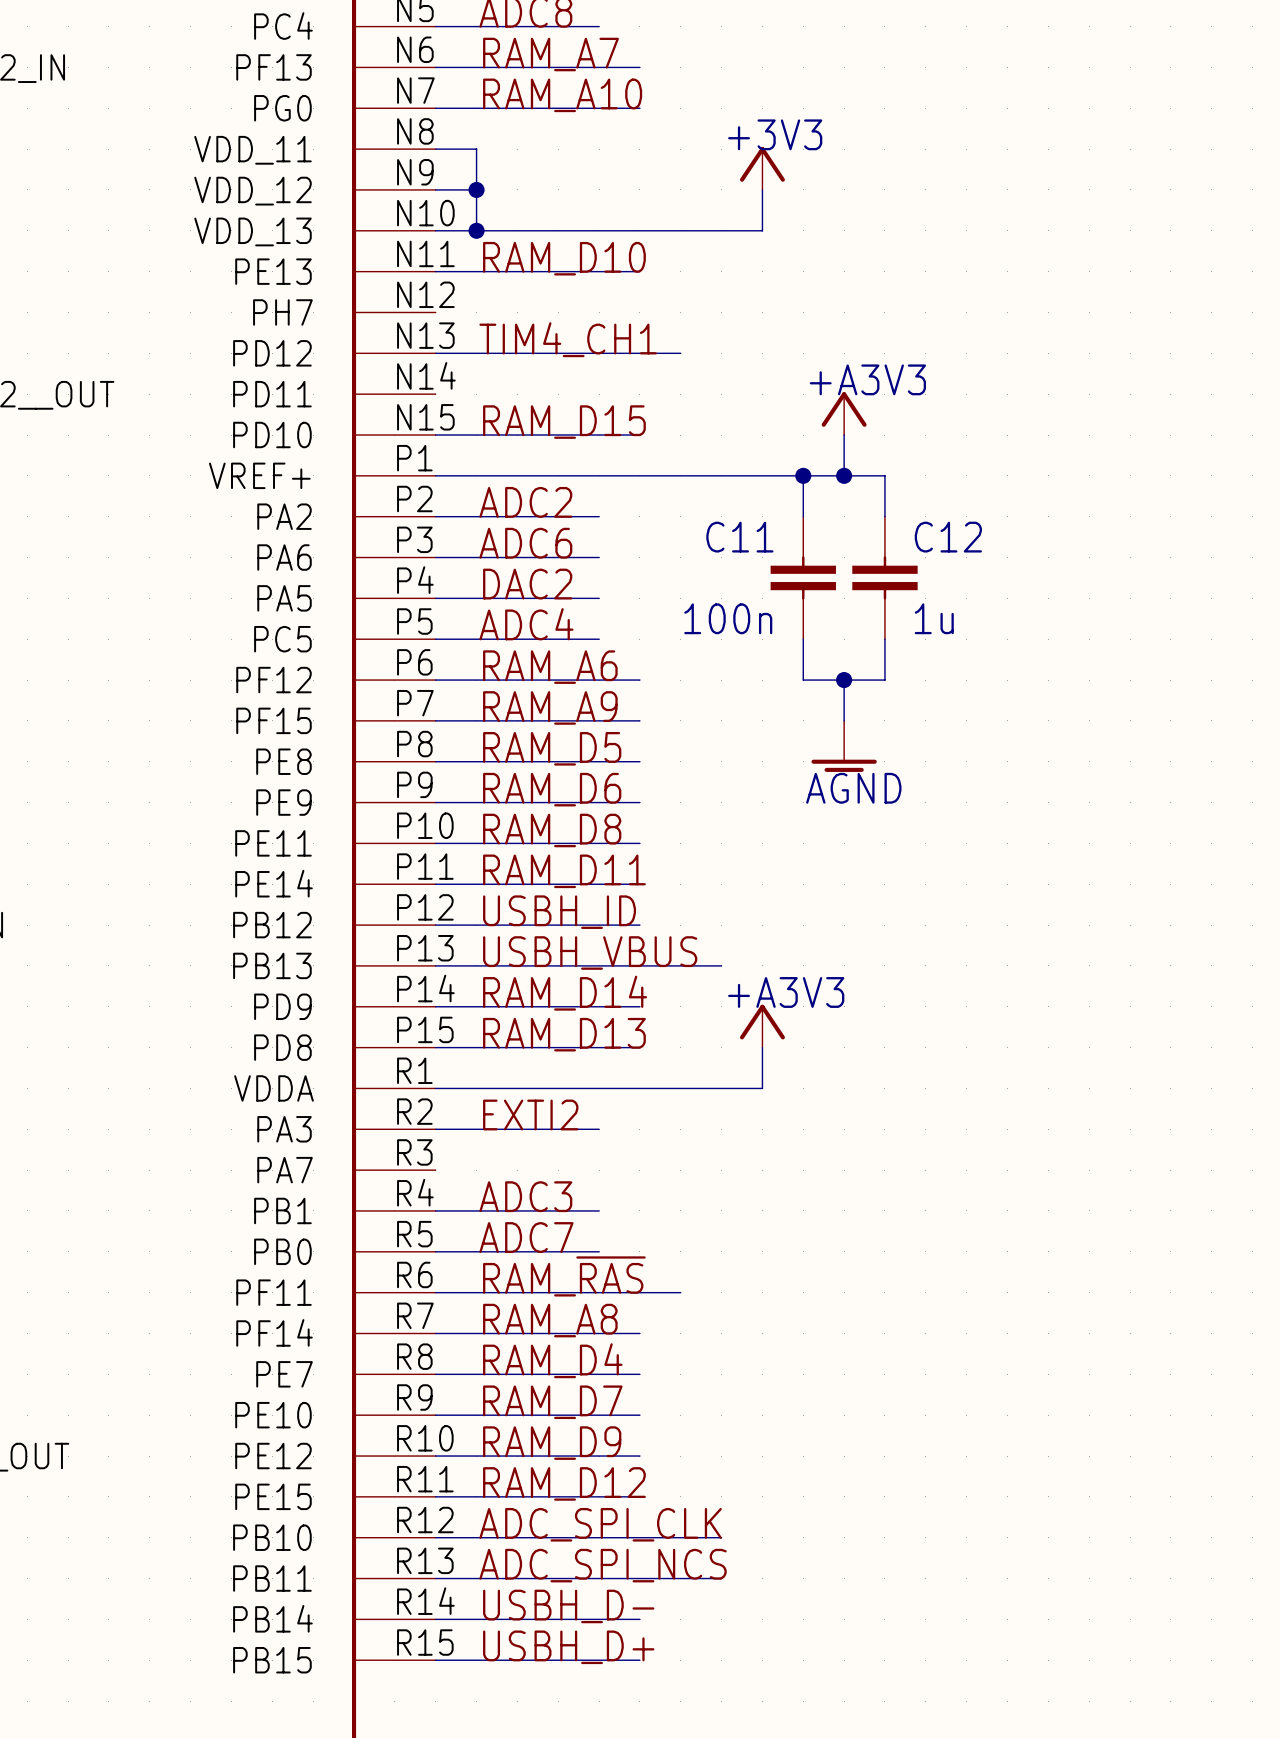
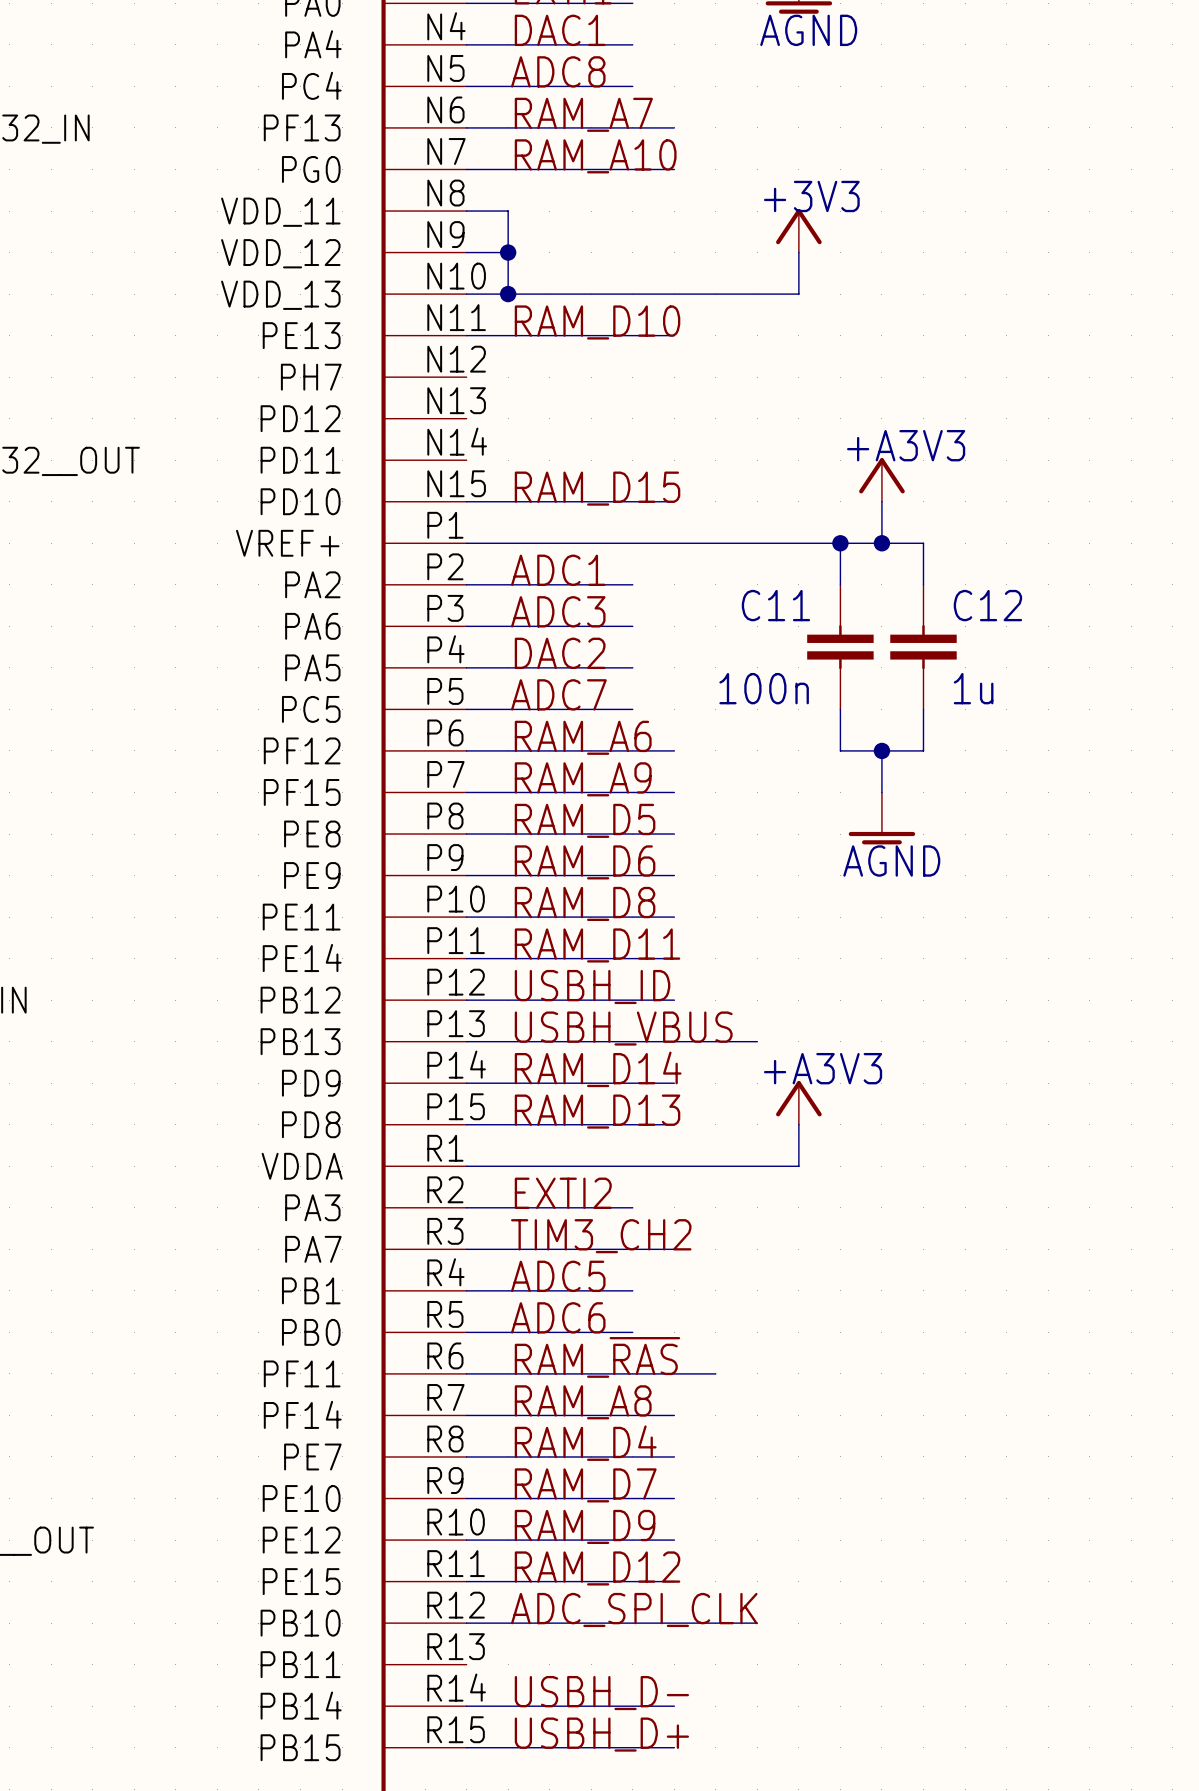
label: TIM4_CH1 (568, 339) -> none
wire: (435, 353) (680, 353) -> none
label: ADC2 (525, 502) -> ADC1 (558, 570)
label: ADC6 (525, 543) -> ADC3 (558, 611)
label: ADC4 (526, 624) -> ADC7 (558, 694)
label: none -> TIM3_CH2 (601, 1236)
wire: none -> (466, 1249) (674, 1249)
label: ADC3 (525, 1196) -> ADC5 (558, 1276)
label: ADC7 (526, 1237) -> ADC6 (558, 1317)
label: ADC_SPI_NCS (603, 1565) -> none
wire: (435, 1578) (721, 1578) -> none

